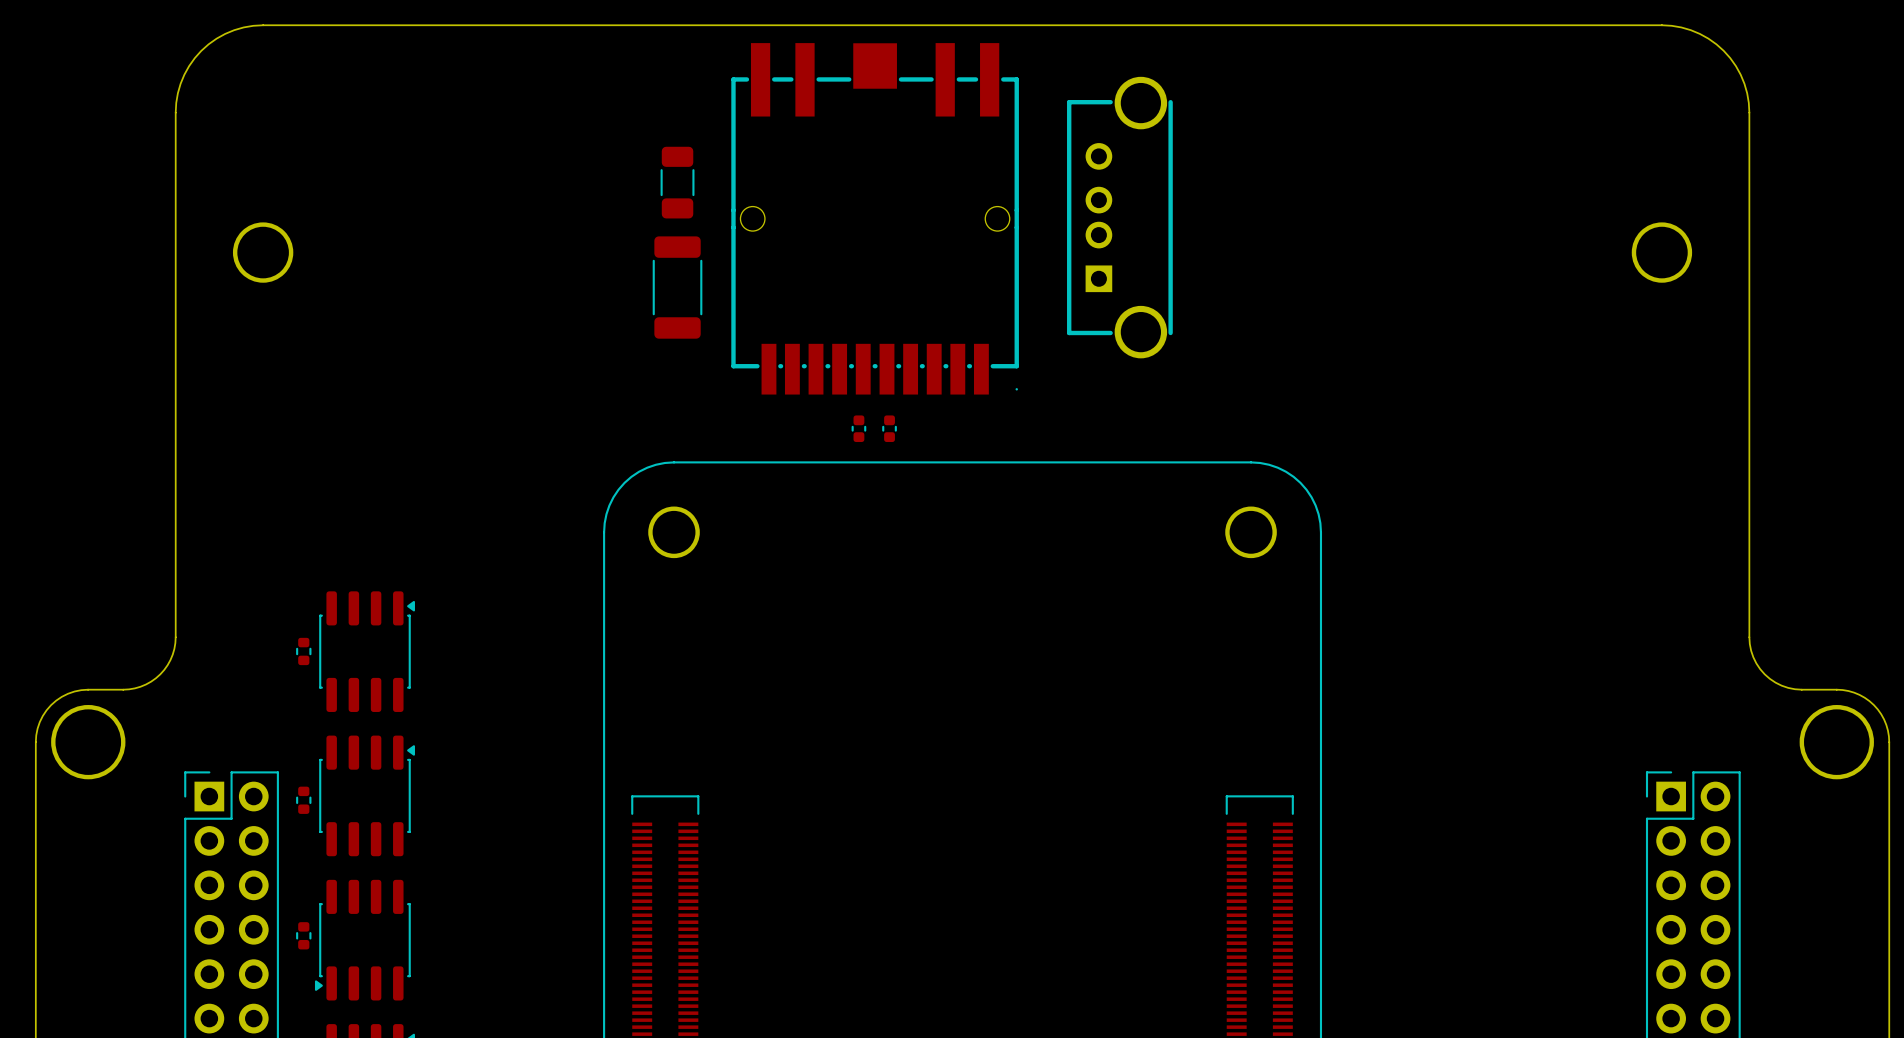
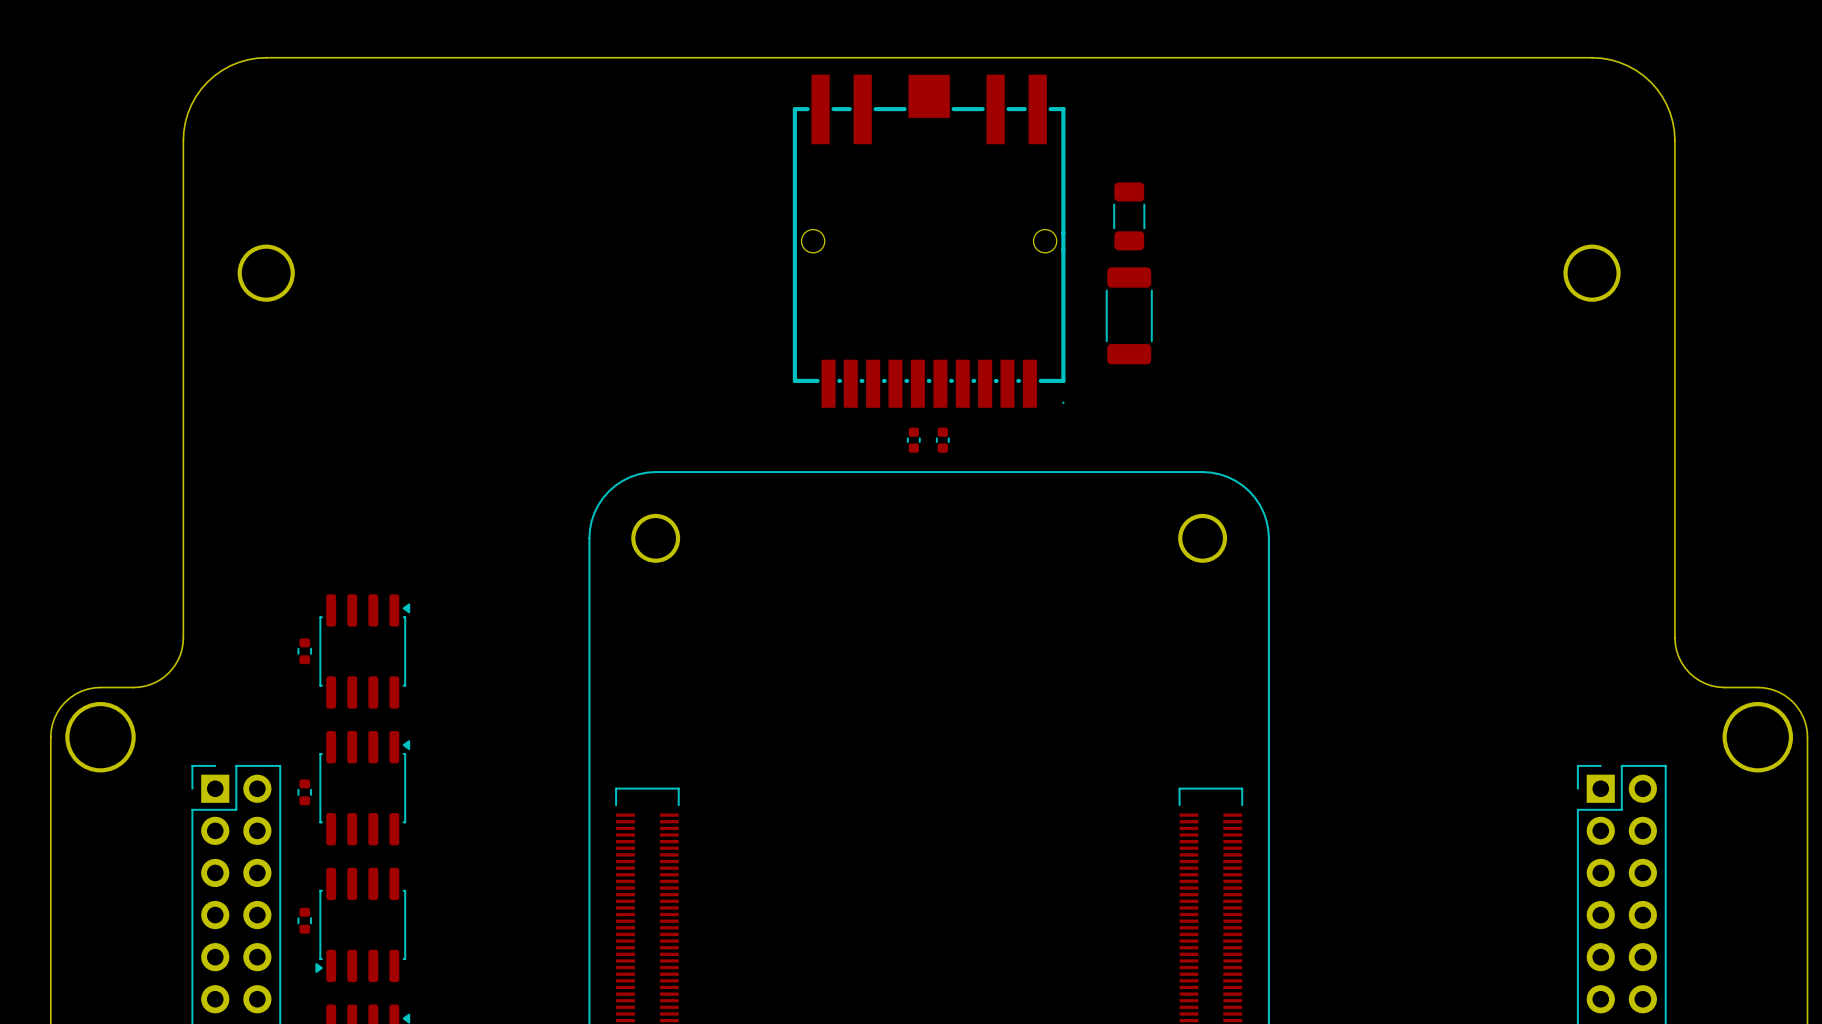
part: (677, 182) -> none
part: none -> (1129, 216)
part: (1119, 217) -> none
part position: (875, 218) -> (929, 241)
part: (677, 287) -> none
part: none -> (1129, 315)
part: (858, 428) -> none
part: (889, 428) -> none
part: none -> (913, 440)
part: none -> (942, 440)

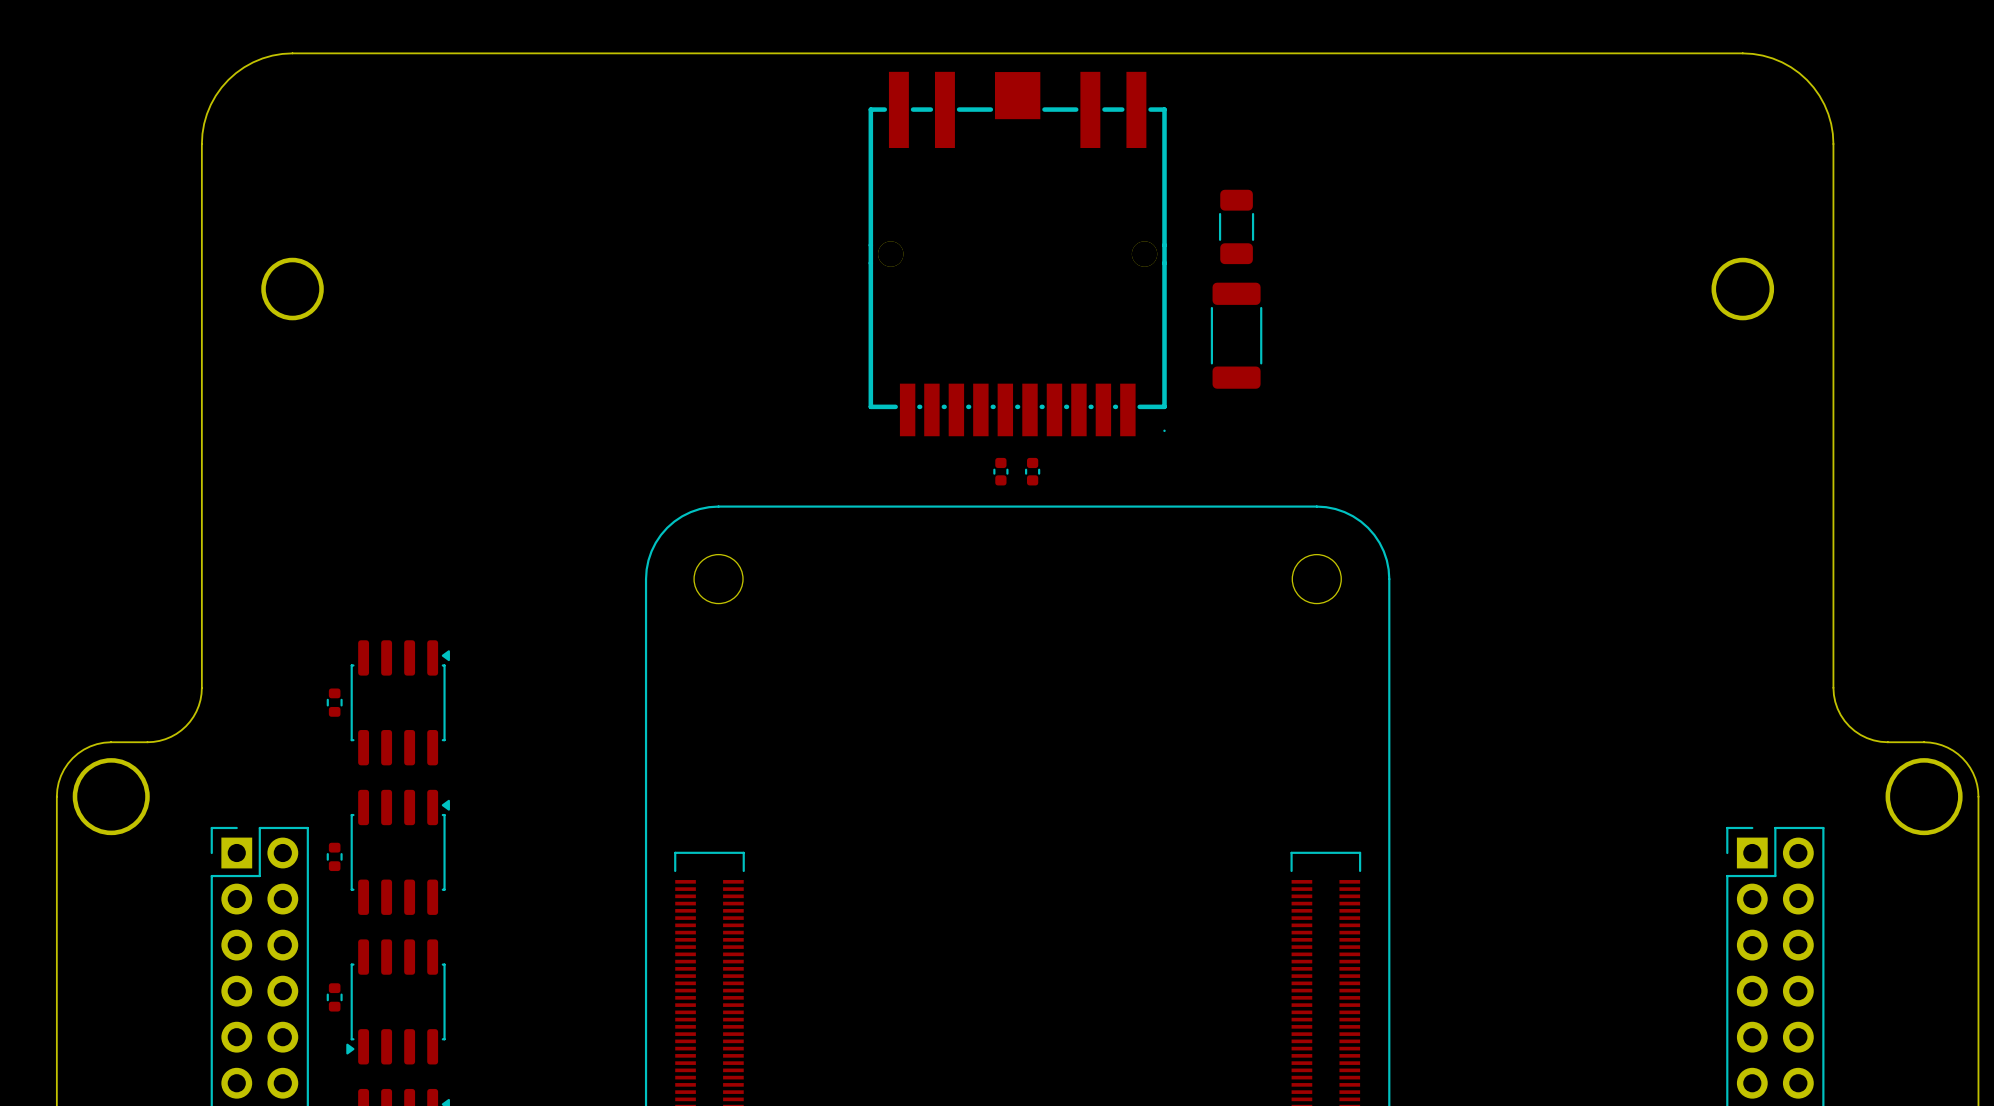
part footprint: [792, 74, 1066, 408] -> [868, 71, 1167, 437]
round board edge: [631, 513, 681, 563] -> none
round board edge: [1178, 513, 1228, 563] -> none

